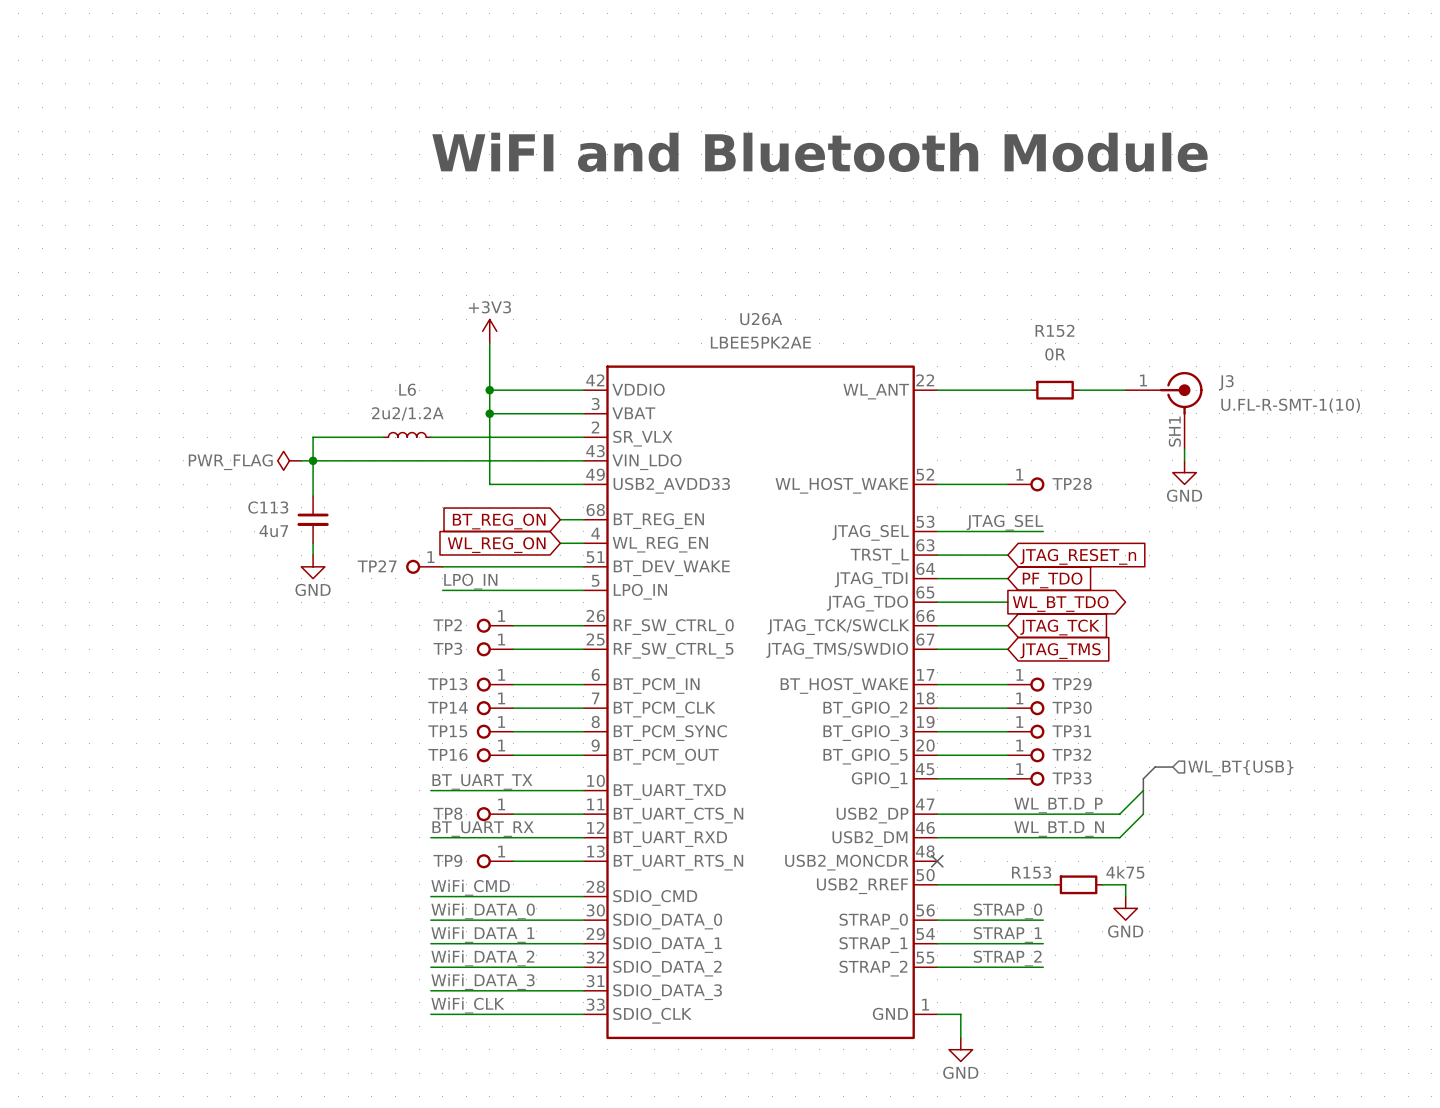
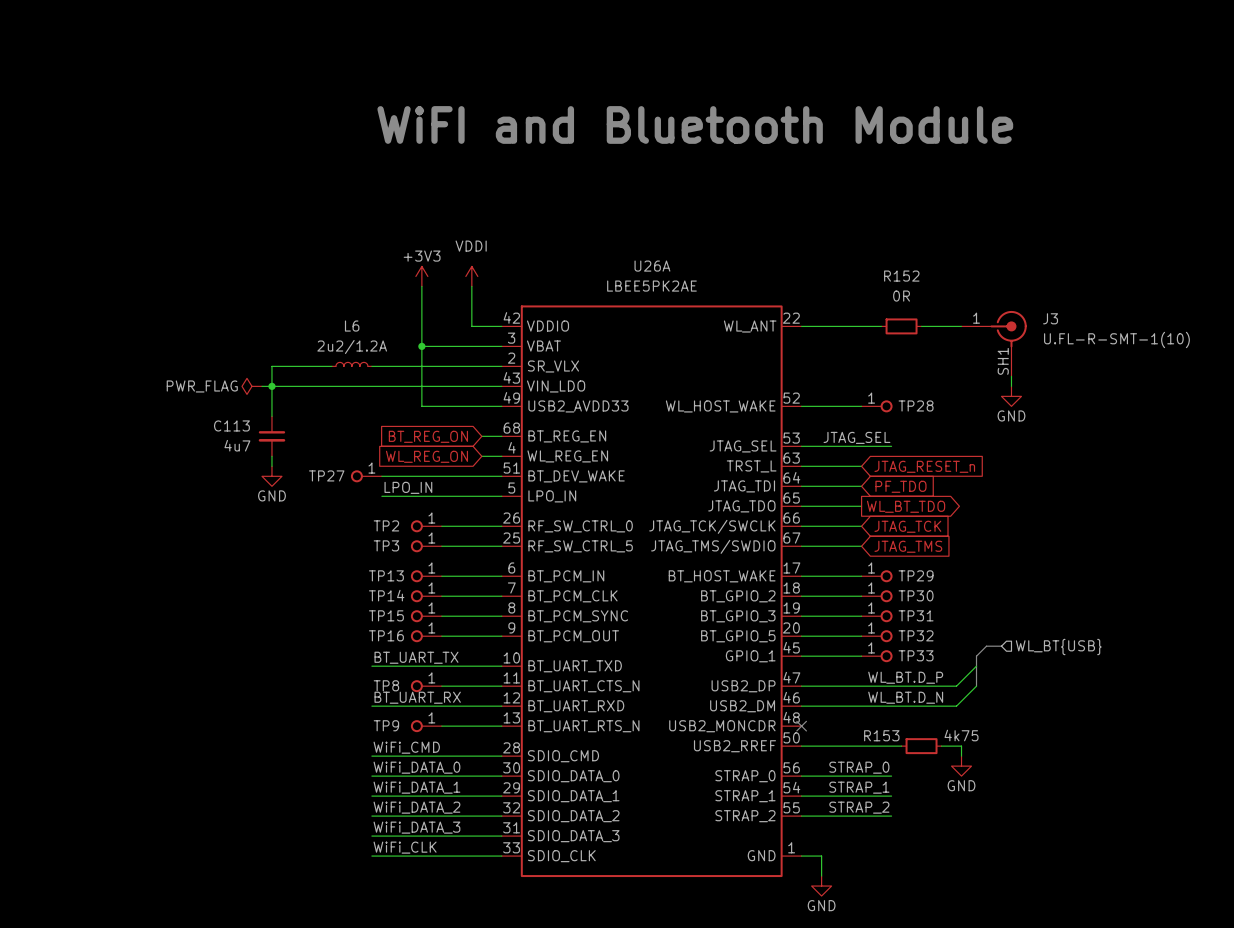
power symbol: none -> VDDI (471, 276)
wire: (489, 390) (548, 390) -> (471, 286) (471, 326)
junction: (489, 390) -> none

